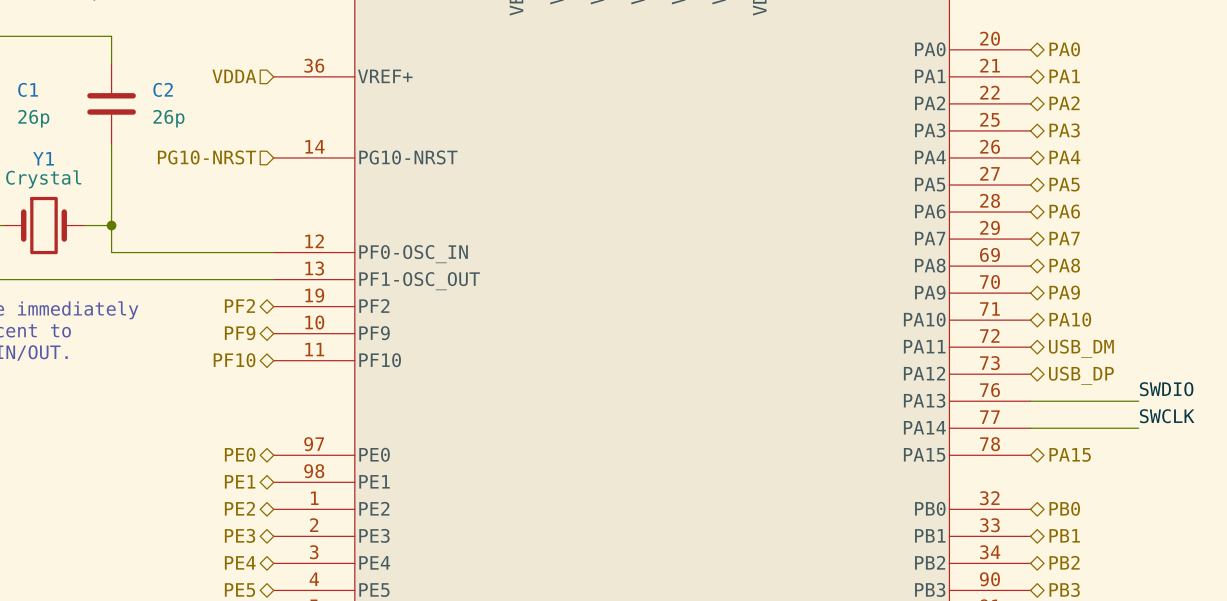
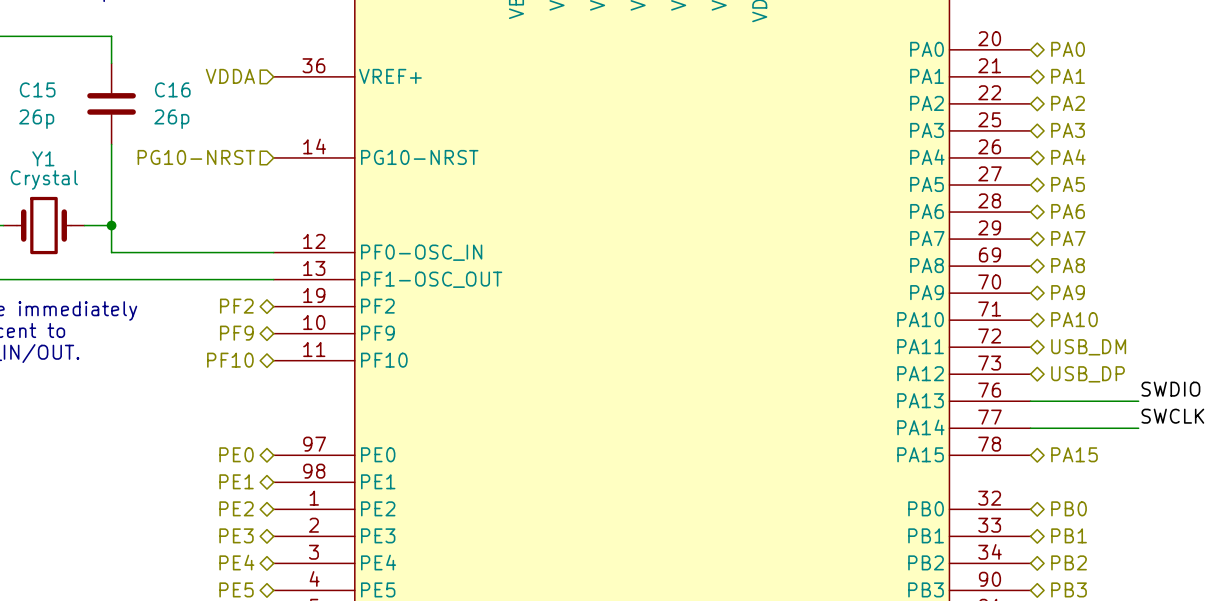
C1 name: C1 (28, 89) -> C15 (37, 89)
C2 name: C2 (163, 89) -> C16 (172, 89)

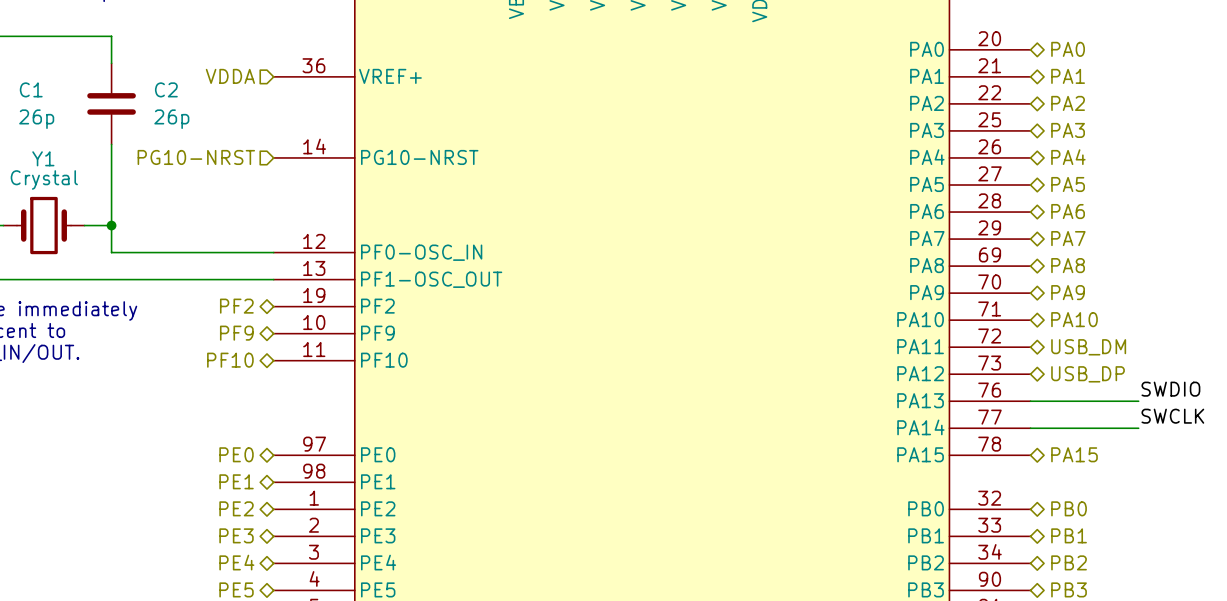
C15 name: C15 (37, 89) -> C1 (31, 89)
C16 name: C16 (172, 89) -> C2 (166, 89)

